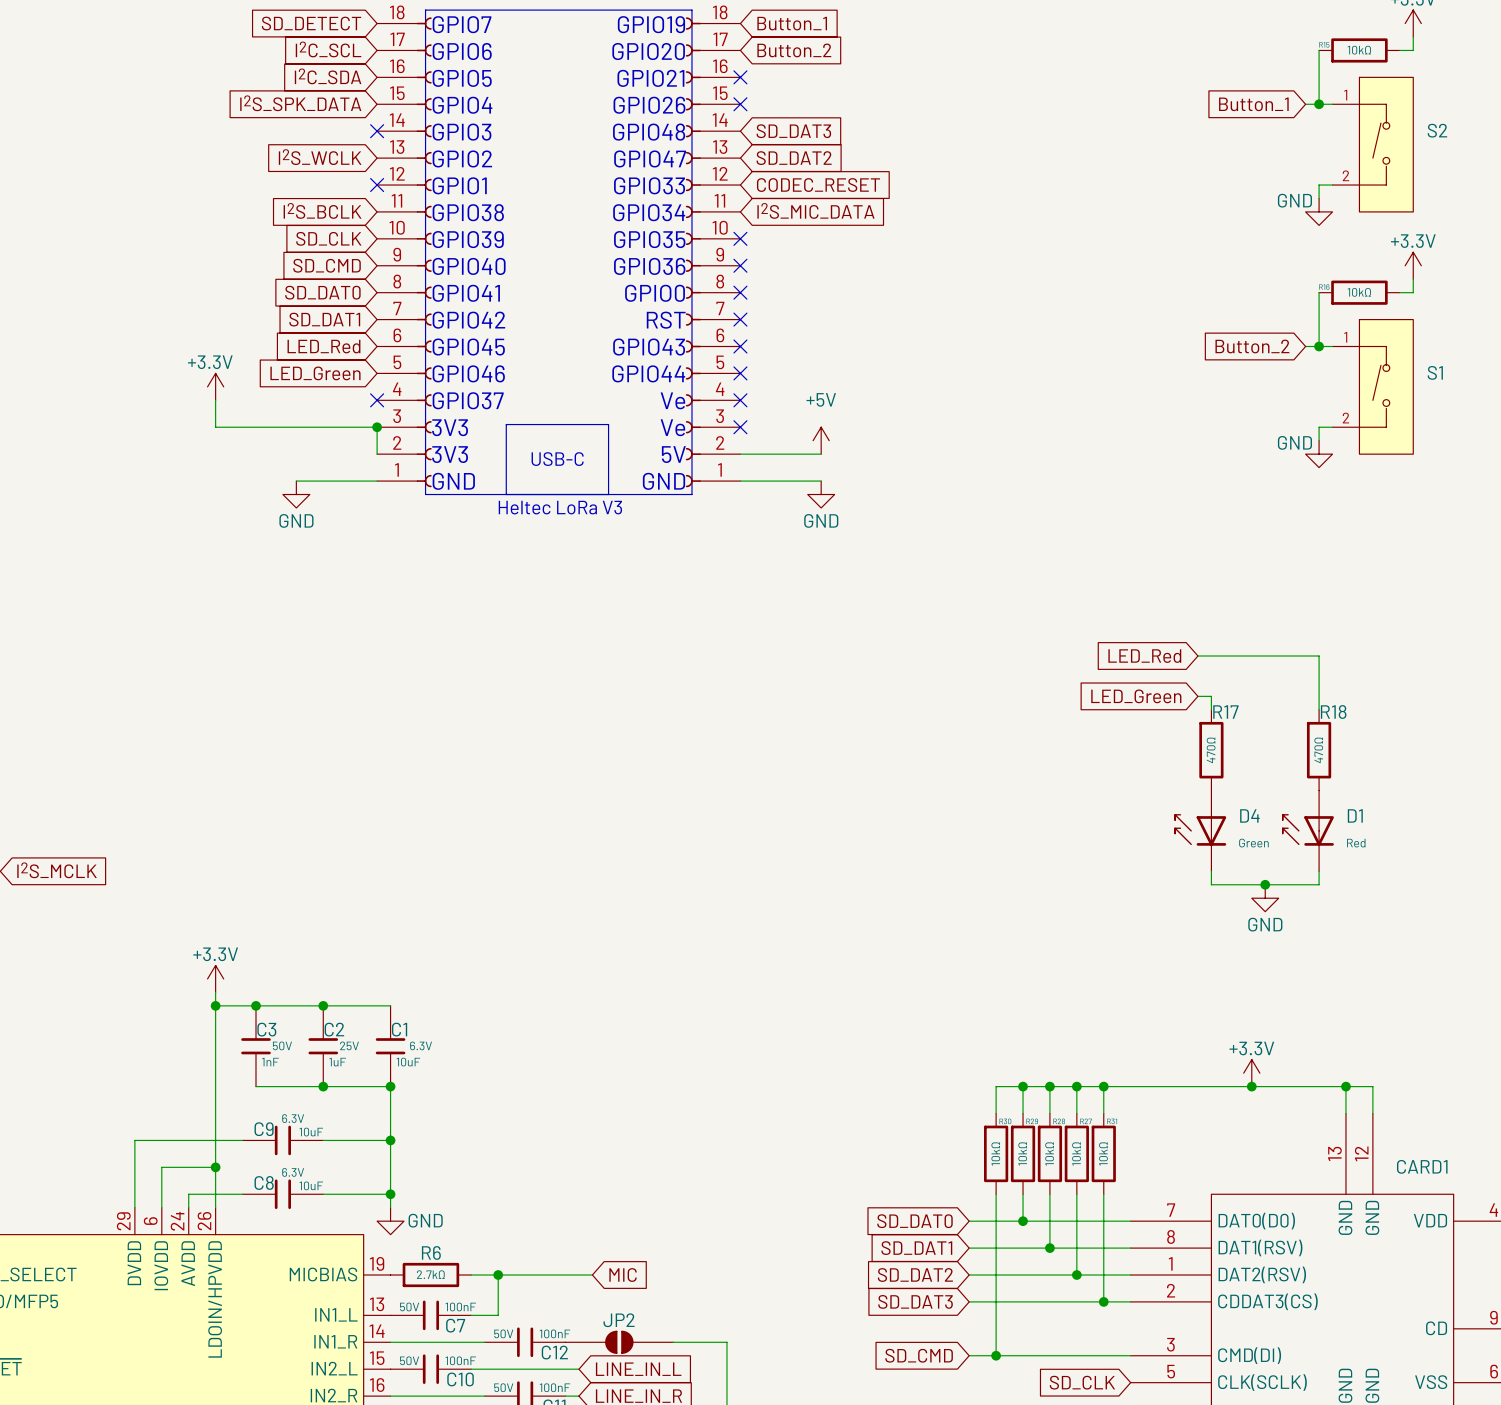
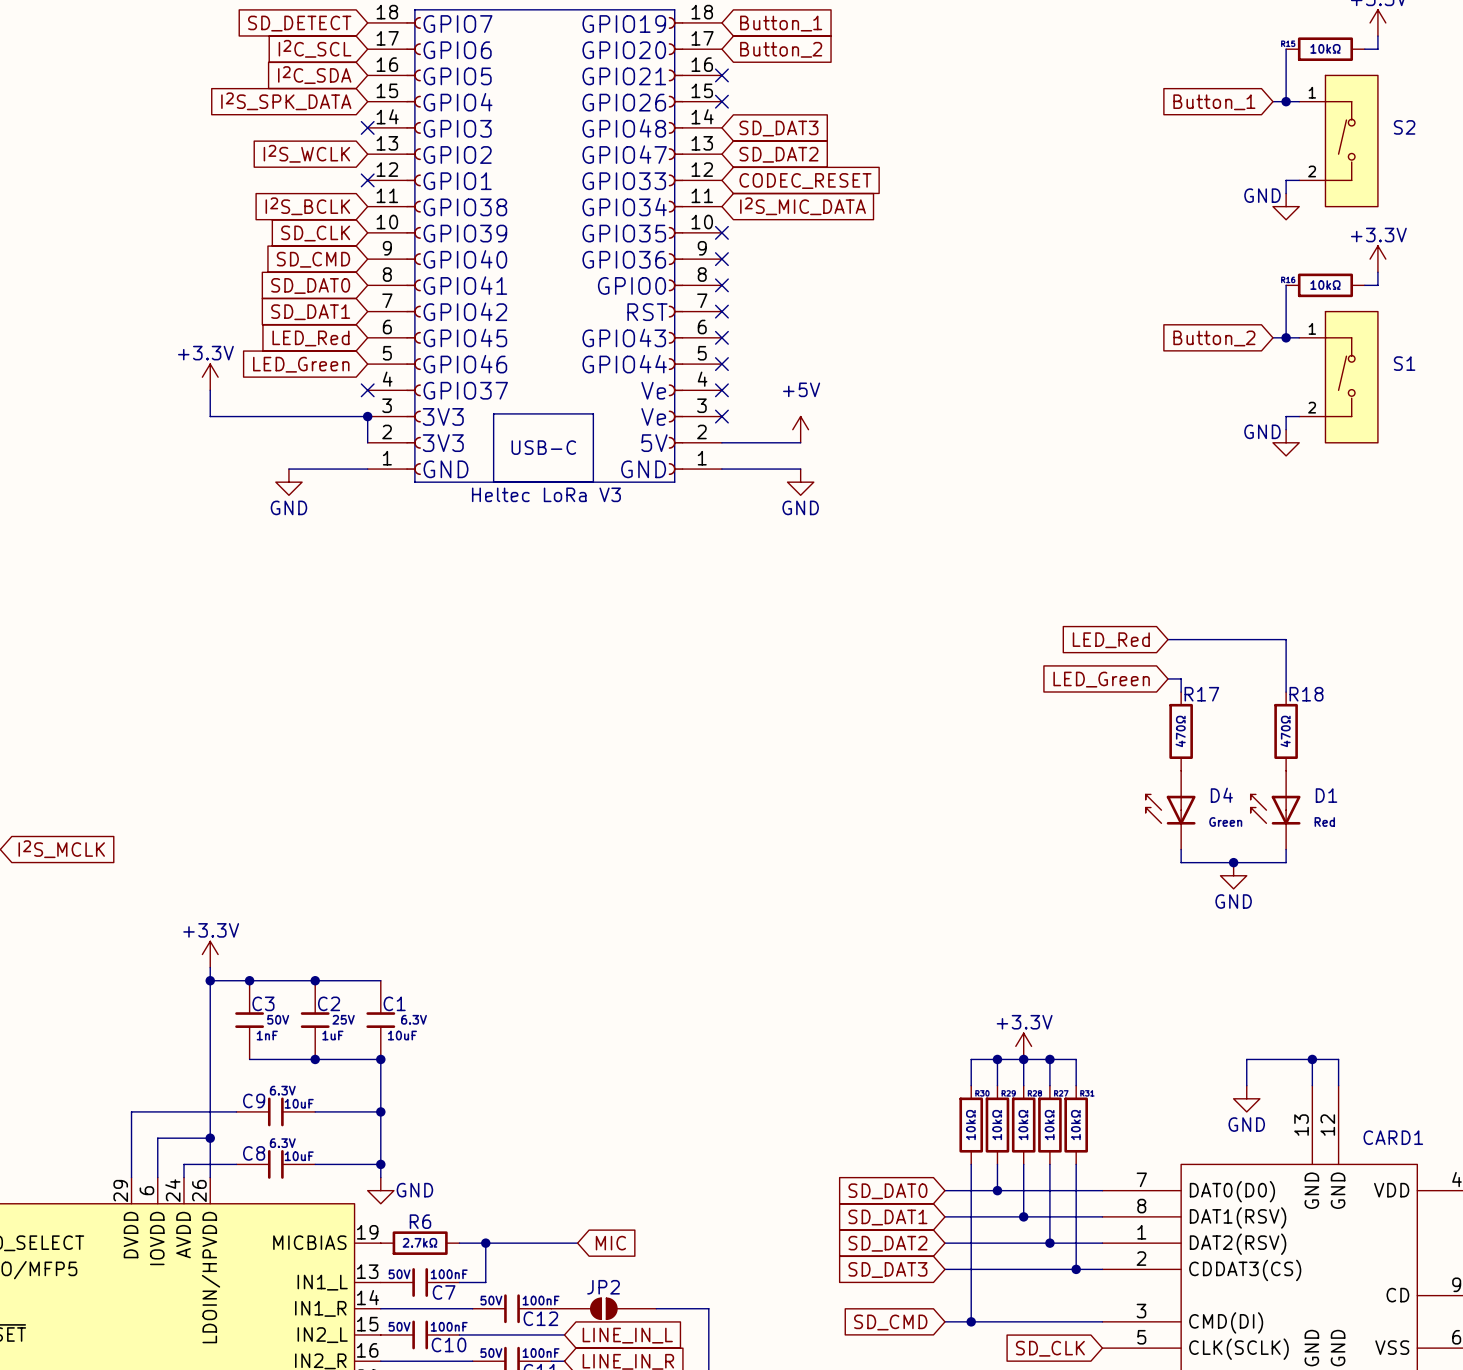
power symbol position: +3.3V (1251, 1073) -> +3.3V (1023, 1046)
wire: (1103, 1086) (1278, 1086) -> (1246, 1085) (1246, 1059)
junction: (1103, 1086) -> none
junction: (1251, 1086) -> none
power symbol: none -> GND (1246, 1098)

